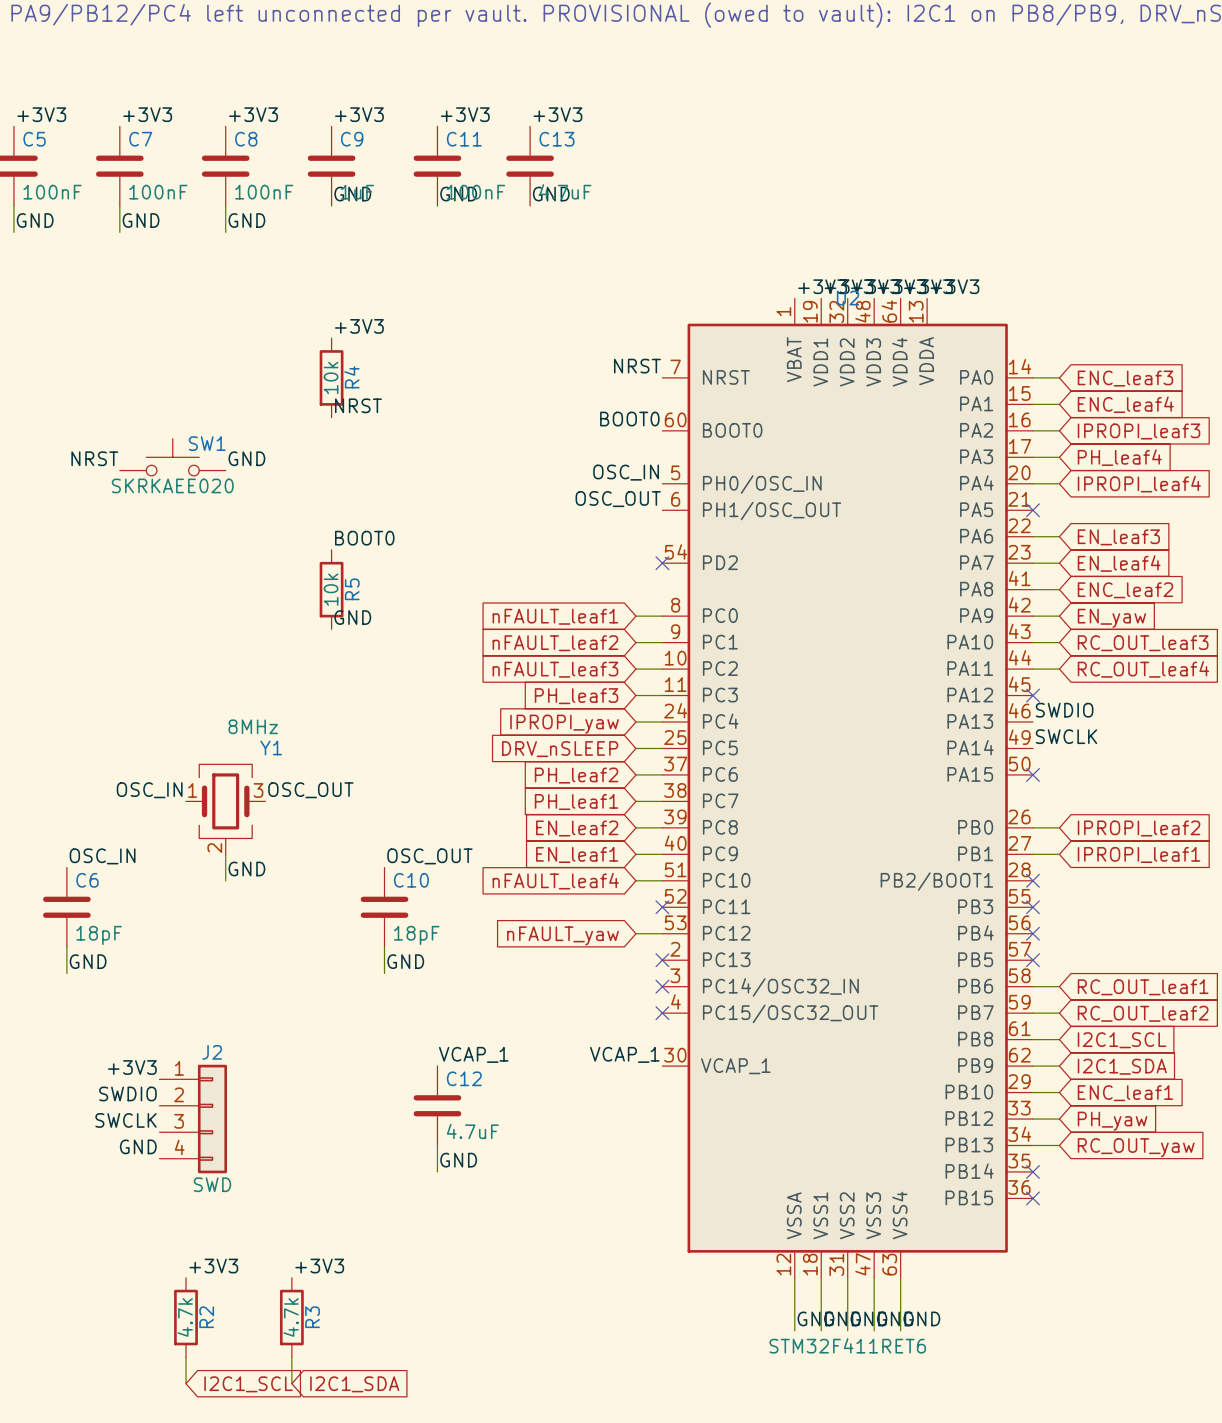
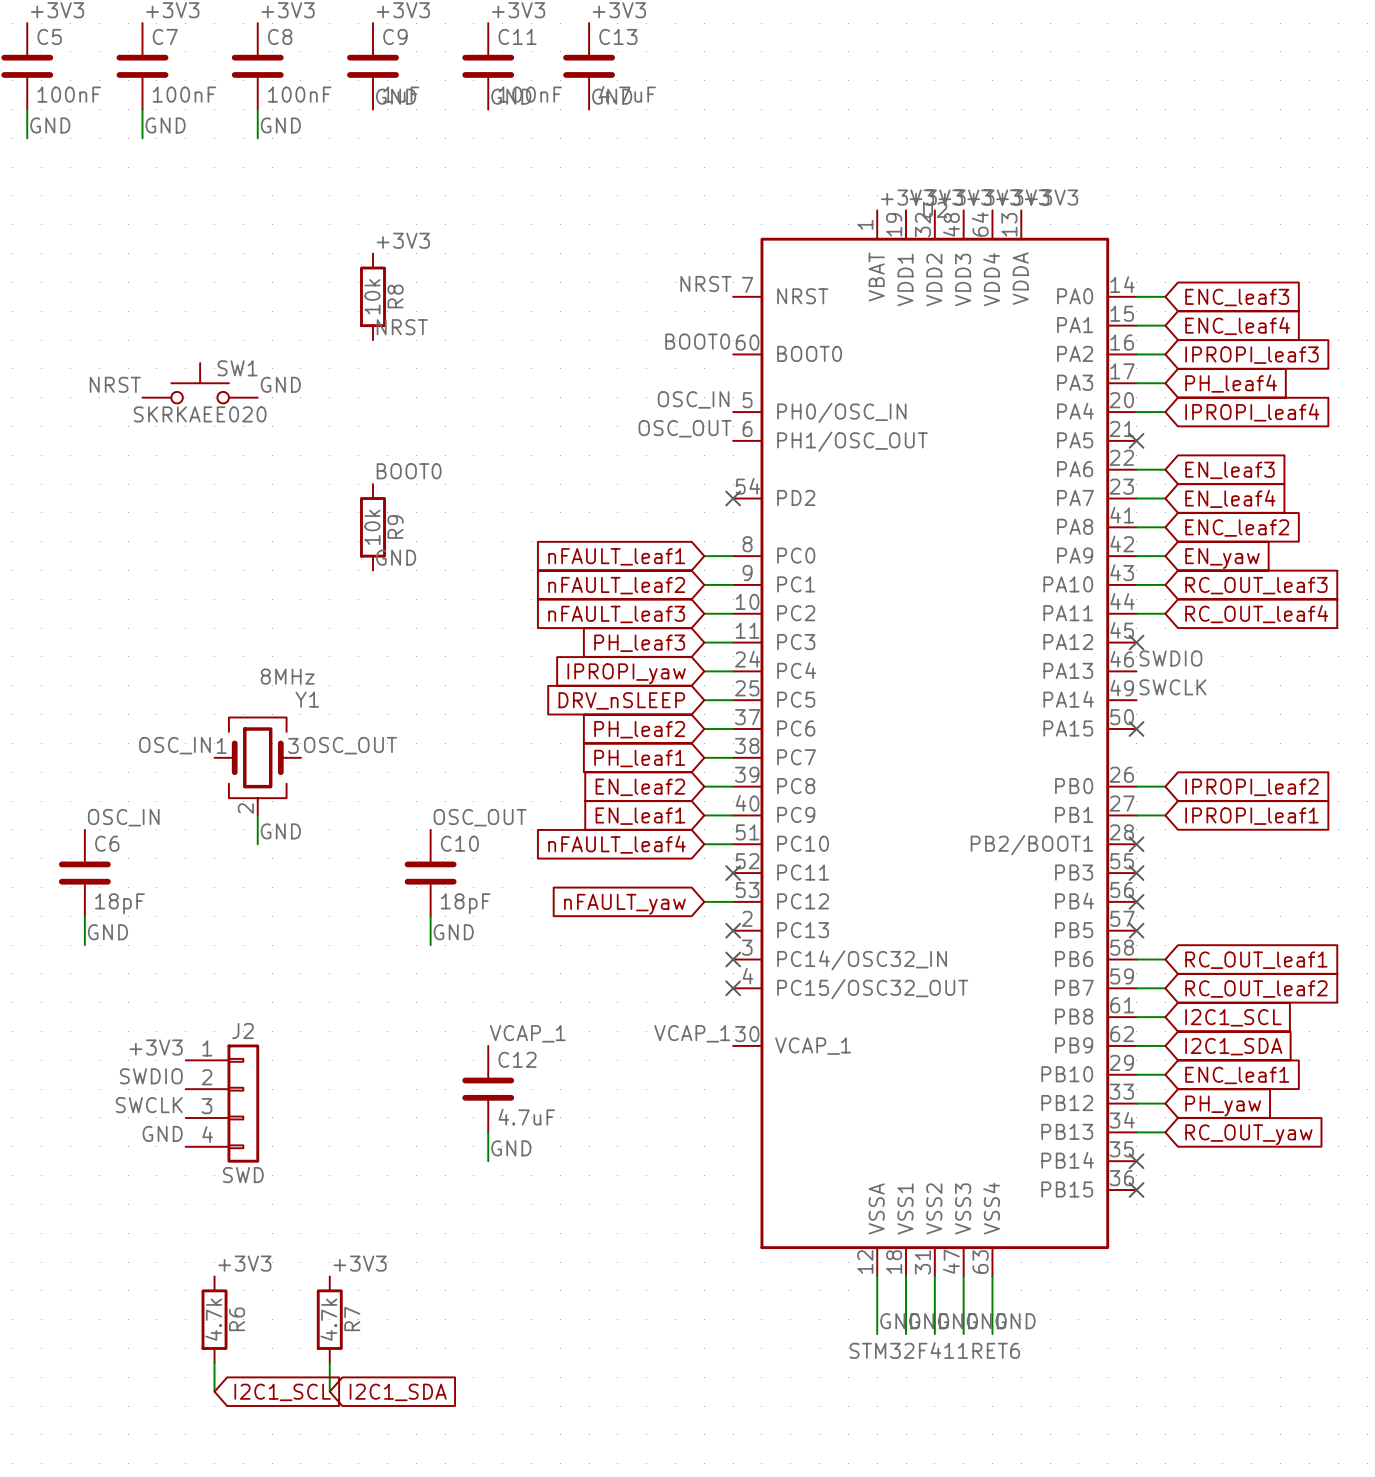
R4 name: R4 (351, 377) -> R8 (395, 296)
R5 name: R5 (352, 589) -> R9 (395, 526)
R2 name: R2 (206, 1317) -> R6 (237, 1319)
R3 name: R3 (312, 1317) -> R7 (352, 1318)

